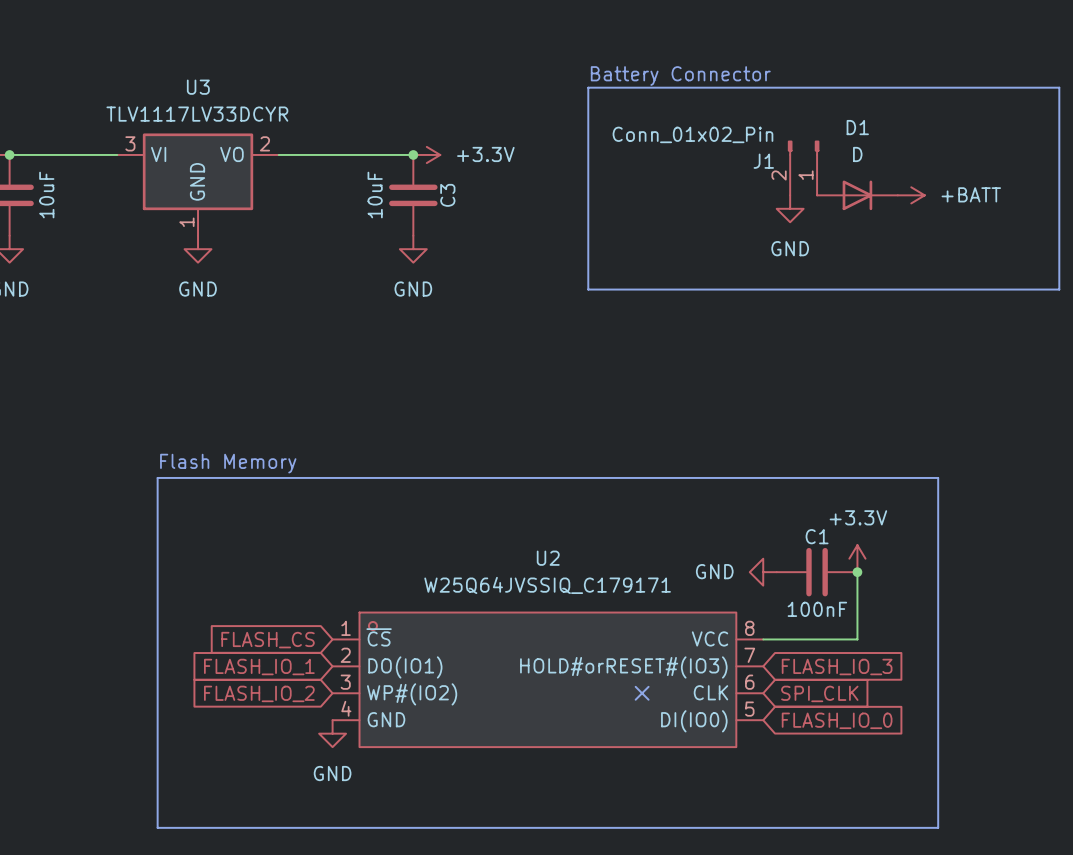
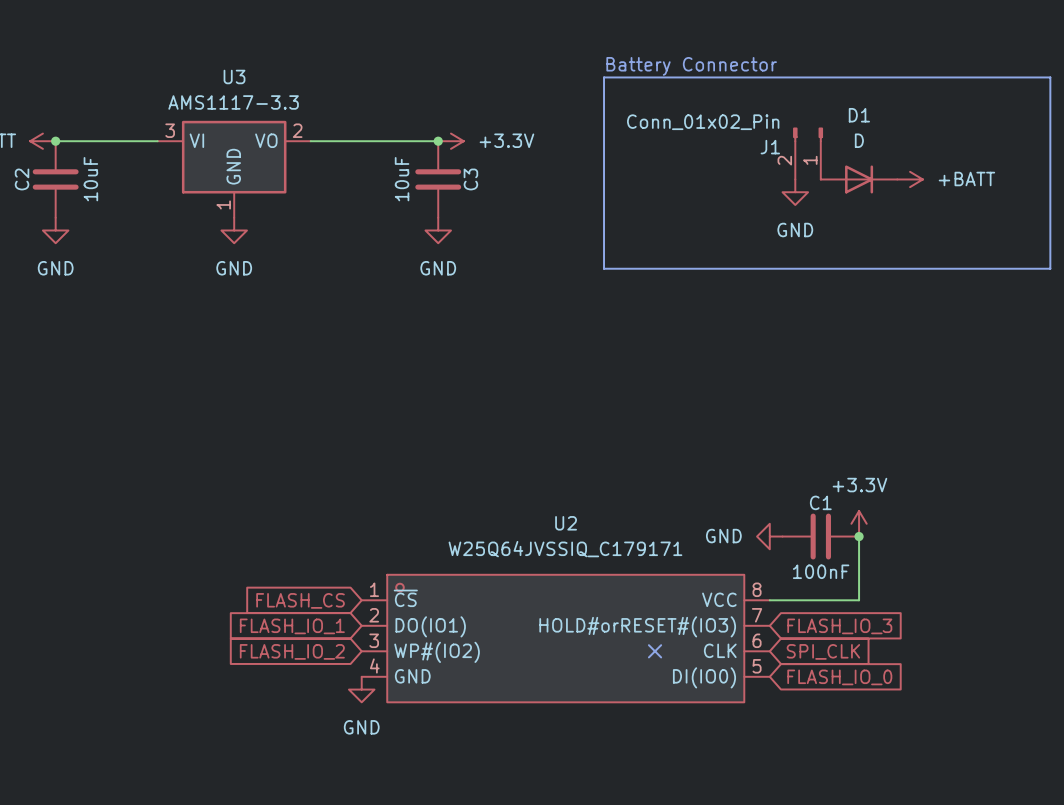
U3 value: TLV1117LV33DCYR (197, 114) -> AMS1117-3.3 (233, 102)
text: Flash Memory (228, 463) -> none
line: (157, 477) (938, 477) (938, 827) (157, 827) (157, 477) -> none

